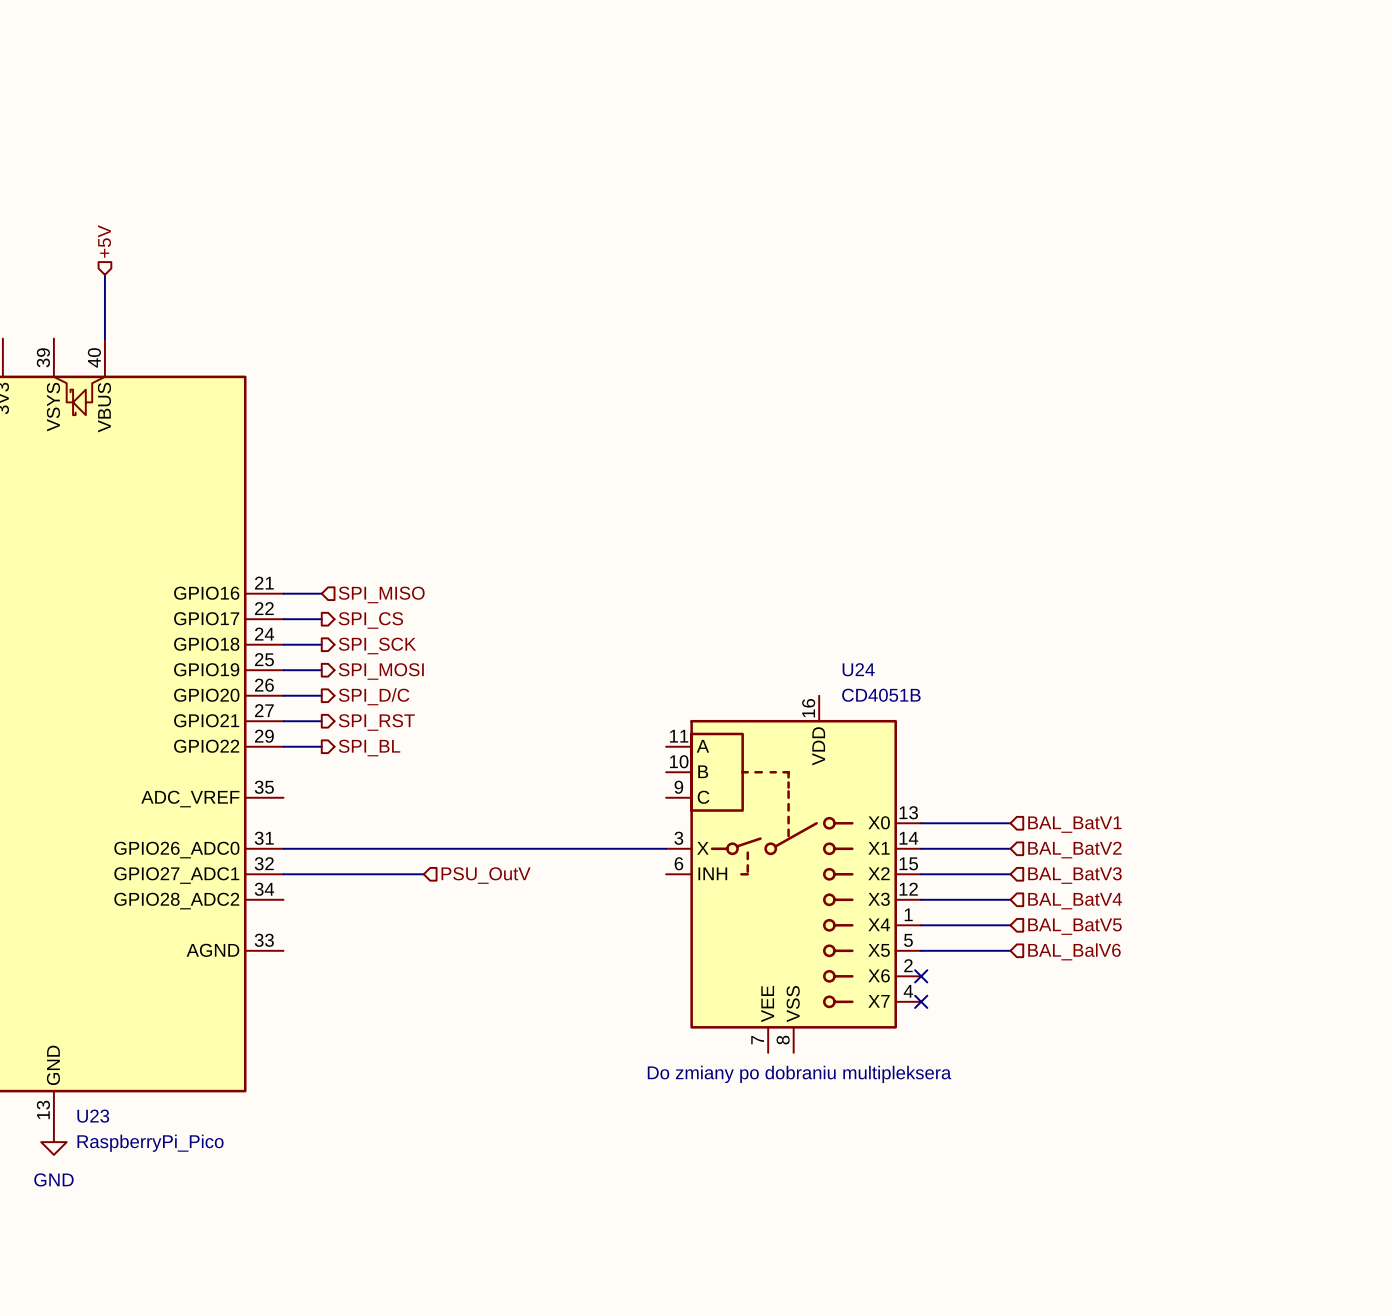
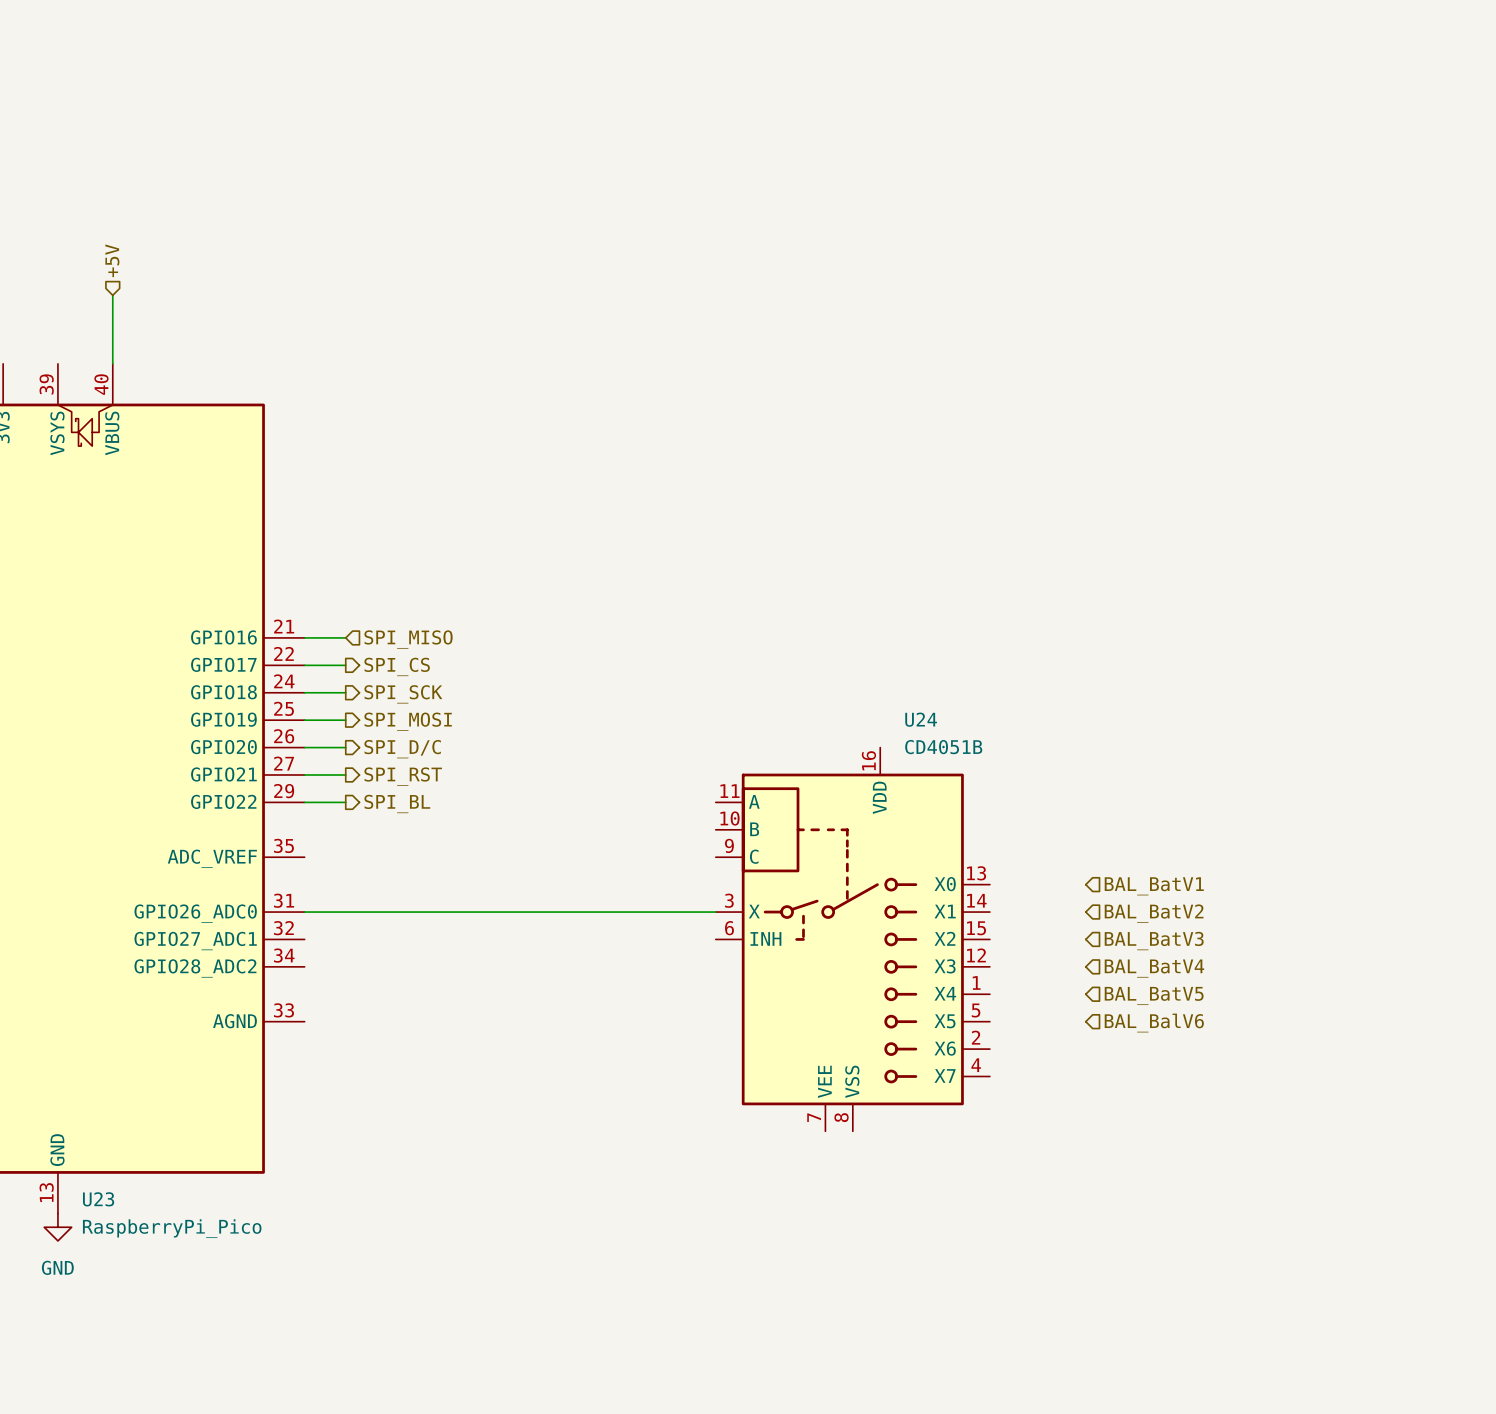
wire: (921, 823) (1010, 823) -> none
wire: (921, 848) (1010, 848) -> none
wire: (283, 874) (423, 874) -> none
wire: (921, 874) (1010, 874) -> none
hierarchical label: PSU_OutV (486, 875) -> none
wire: (921, 899) (1010, 899) -> none
wire: (921, 925) (1010, 925) -> none
wire: (921, 950) (1010, 950) -> none
no-connect mark: (921, 976) -> none
no-connect mark: (921, 1001) -> none
text: Do zmiany po dobraniu multipleksera (799, 1074) -> none

